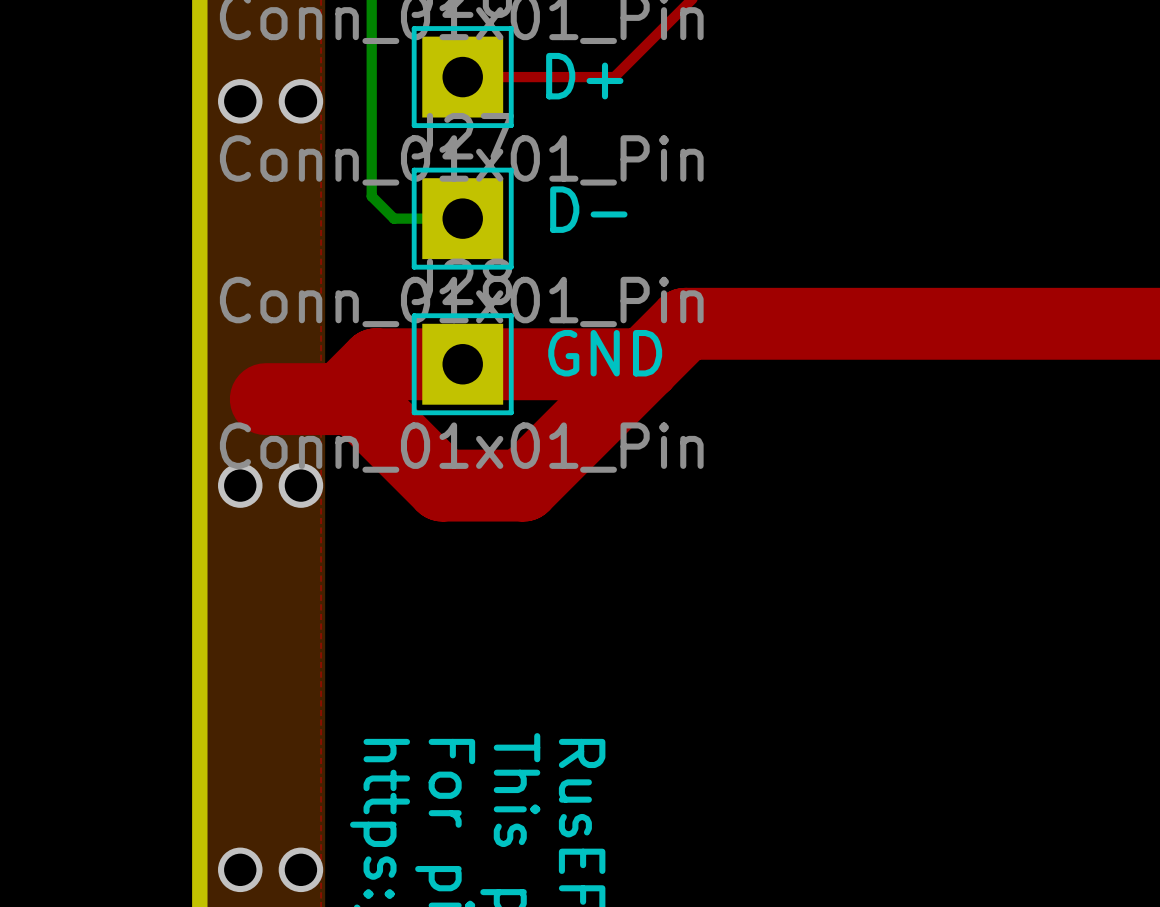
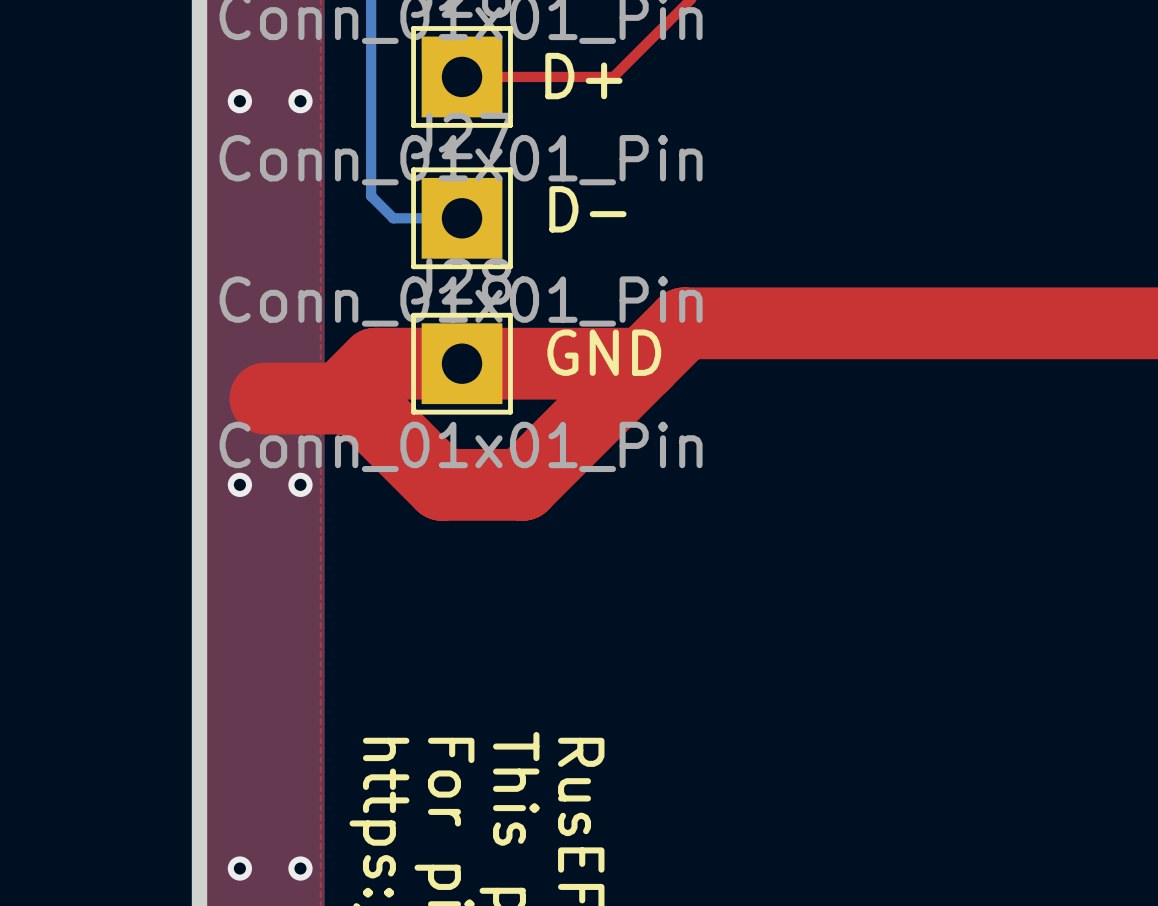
via size: [218, 79, 263, 124] -> [227, 89, 253, 114]
via size: [278, 79, 324, 124] -> [288, 89, 313, 114]
via size: [218, 463, 263, 508] -> [227, 472, 253, 497]
via size: [278, 463, 324, 508] -> [288, 472, 313, 497]
via size: [218, 847, 263, 893] -> [227, 856, 253, 881]
via size: [278, 847, 324, 893] -> [288, 856, 313, 881]

